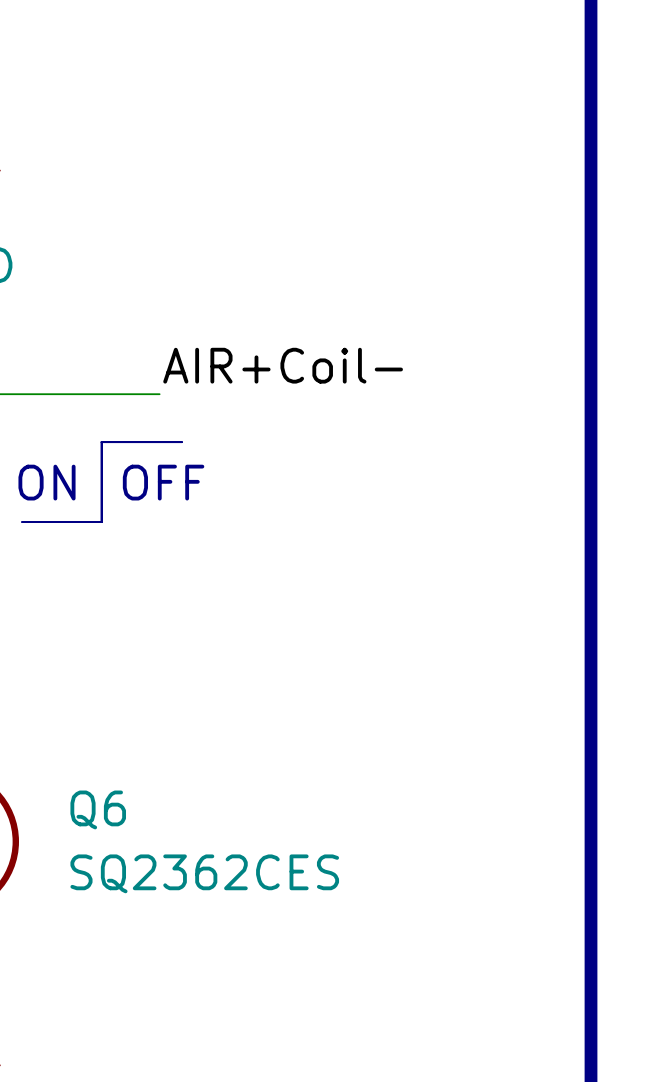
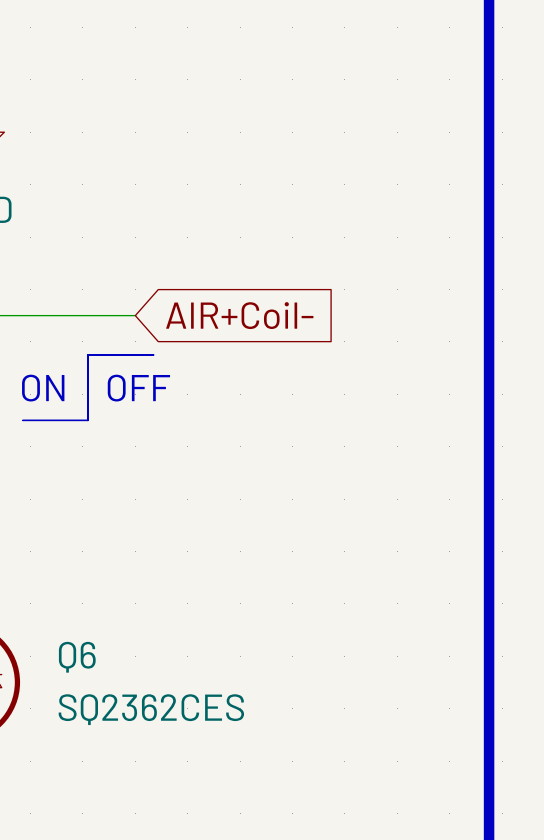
label: AIR+Coil- (283, 365) -> none
global label: none -> AIR+Coil- (239, 315)

